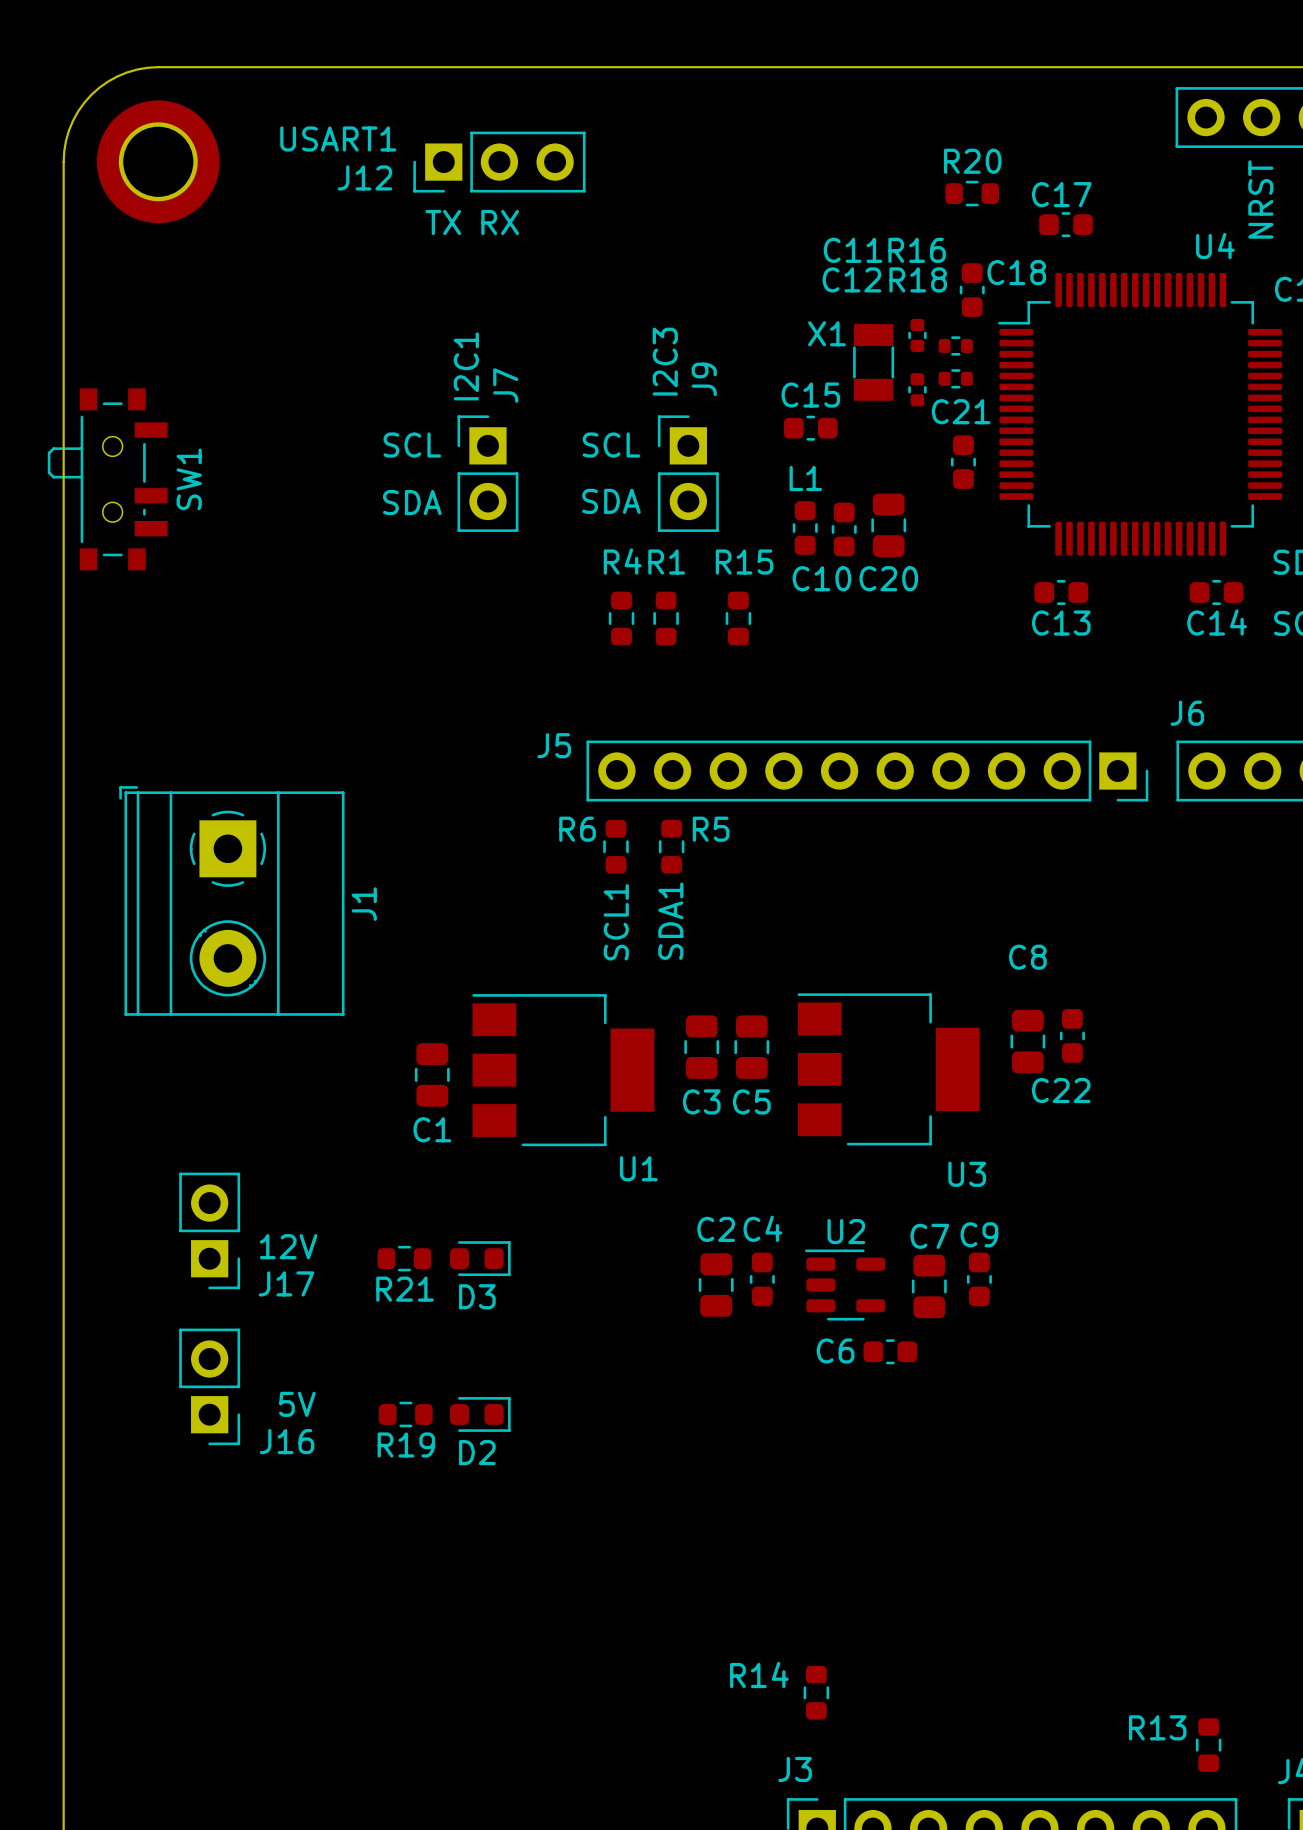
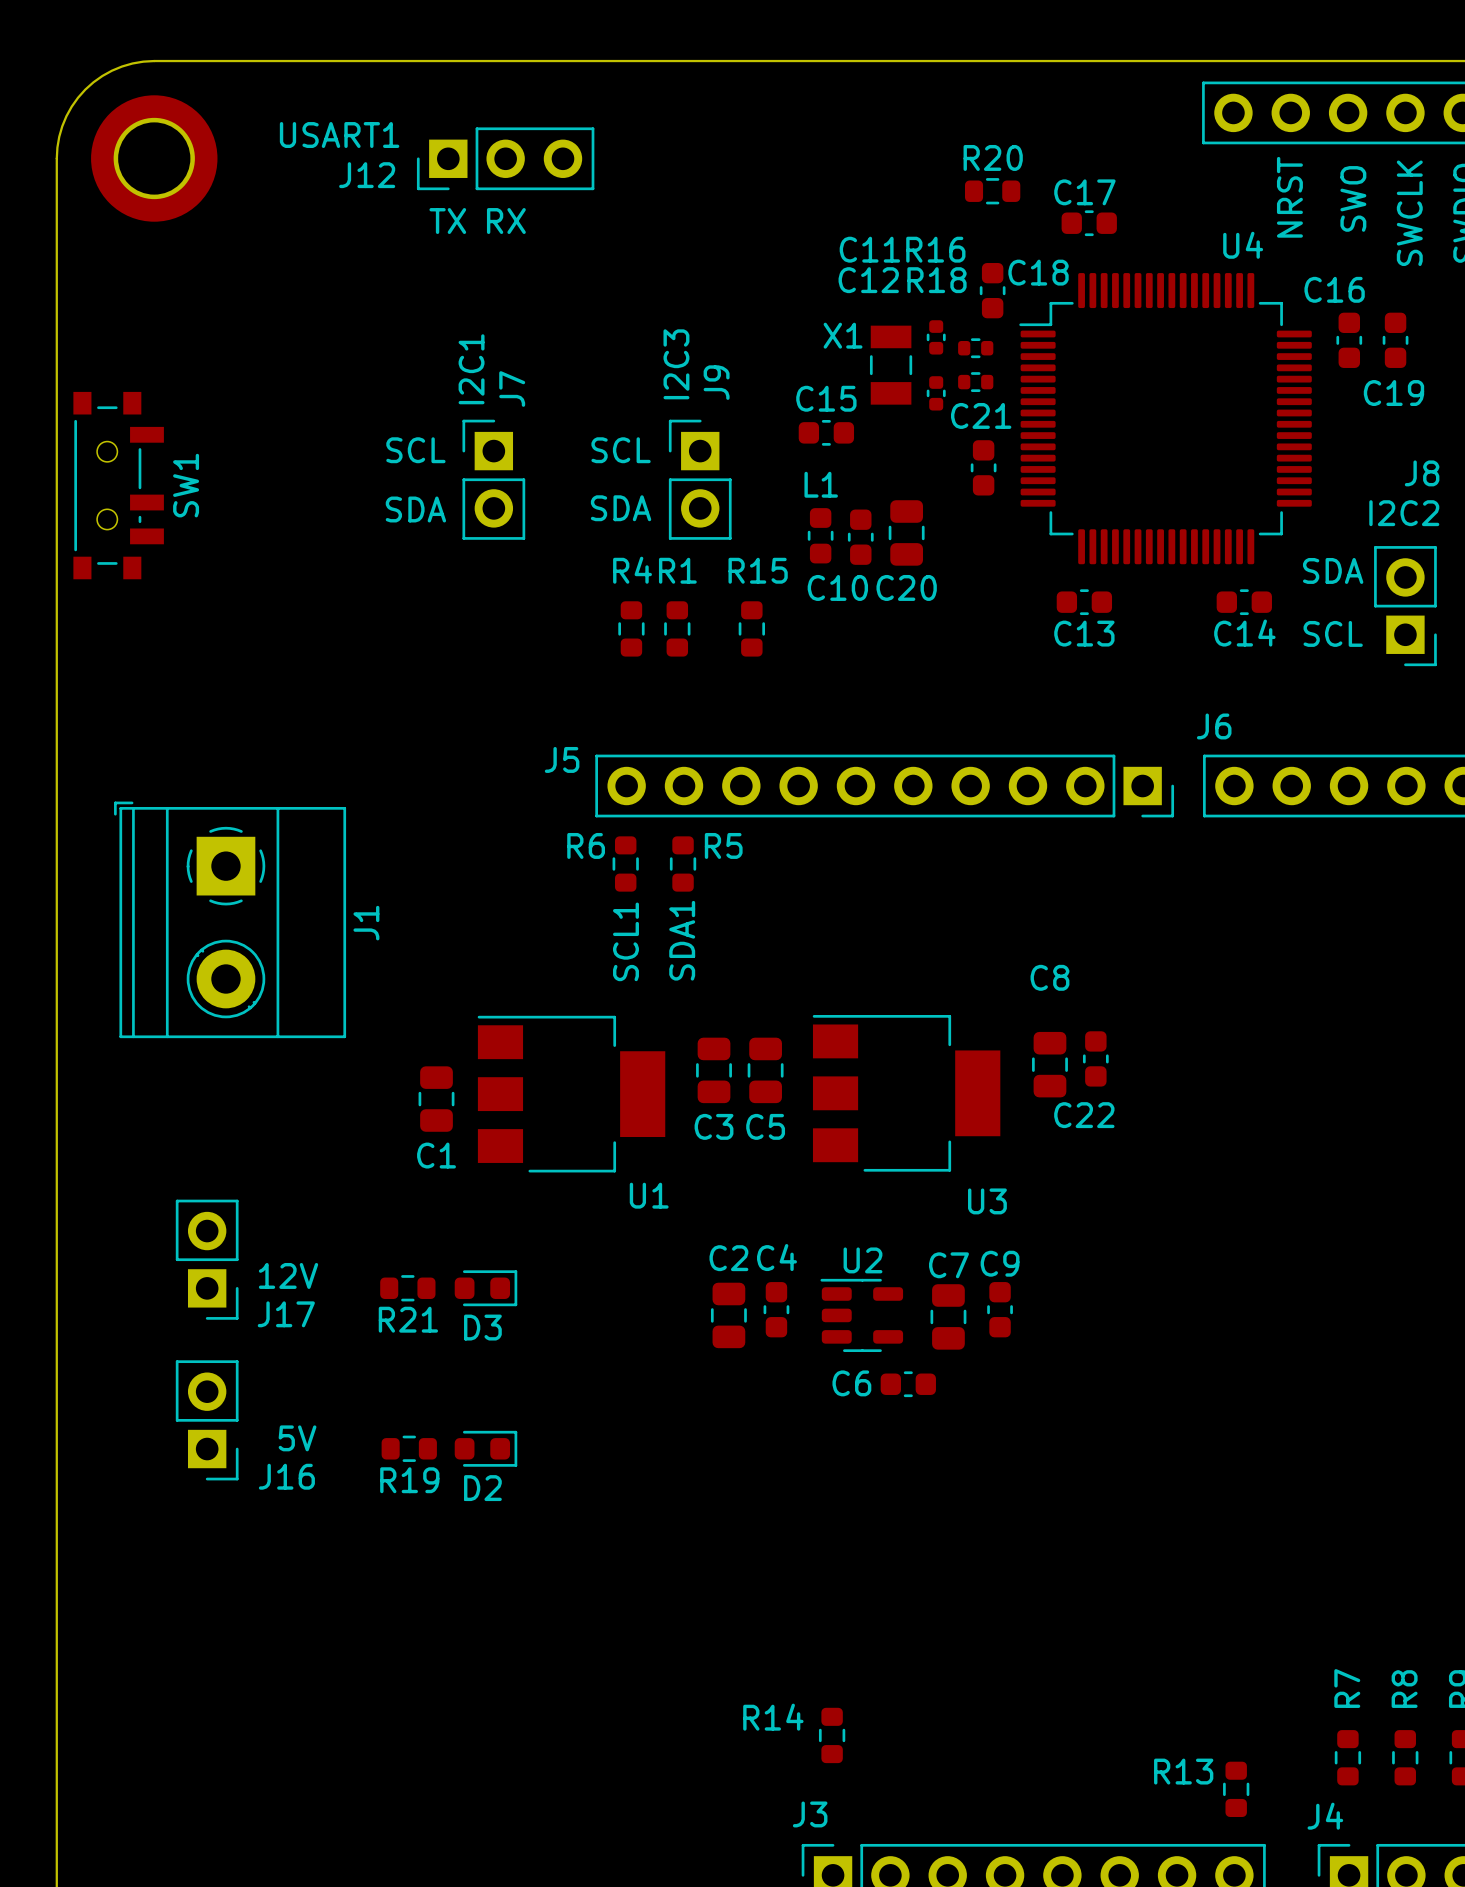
X1 footprint: [853, 324, 895, 401] -> [869, 325, 913, 405]
SW1 footprint: [47, 388, 168, 571] -> [73, 391, 164, 580]

